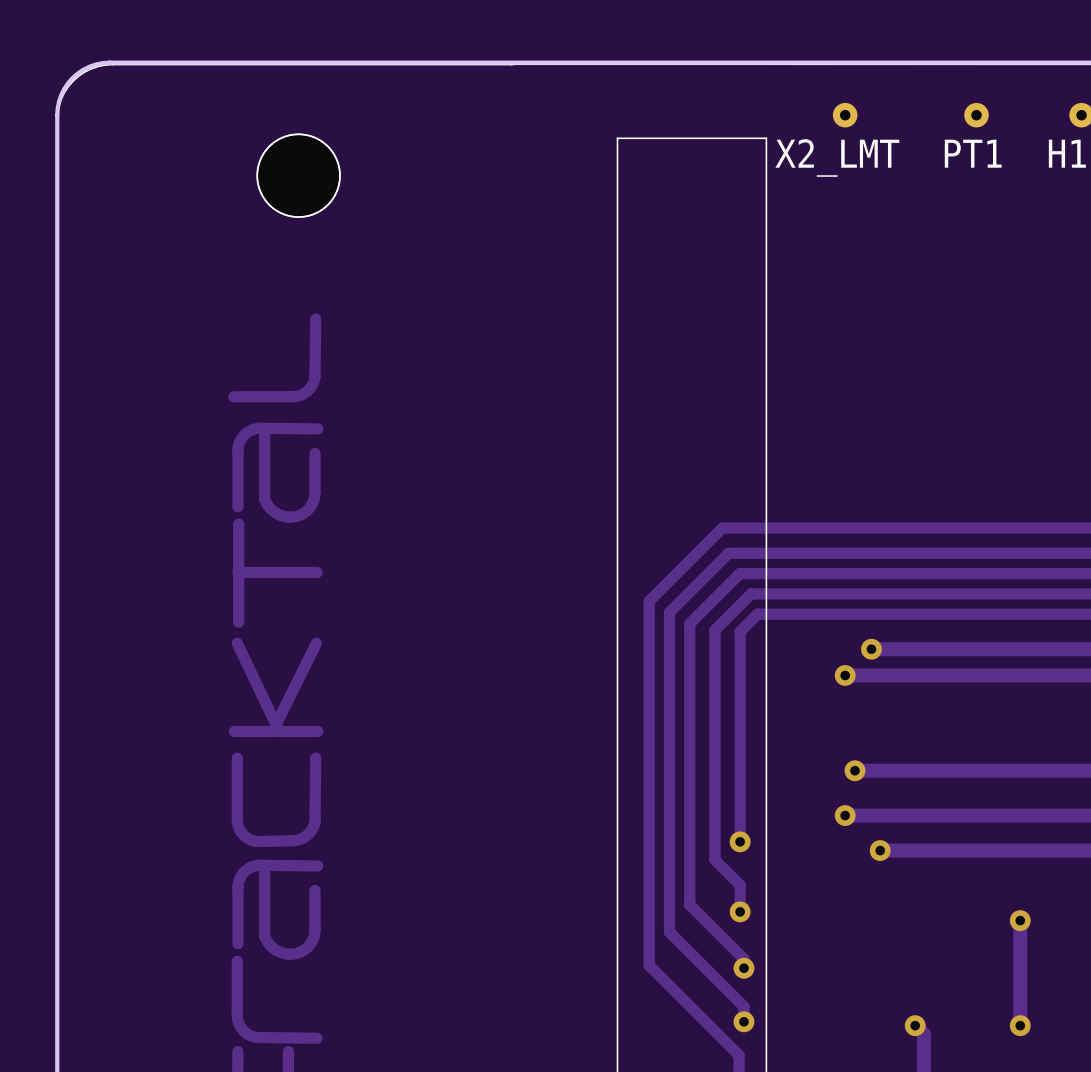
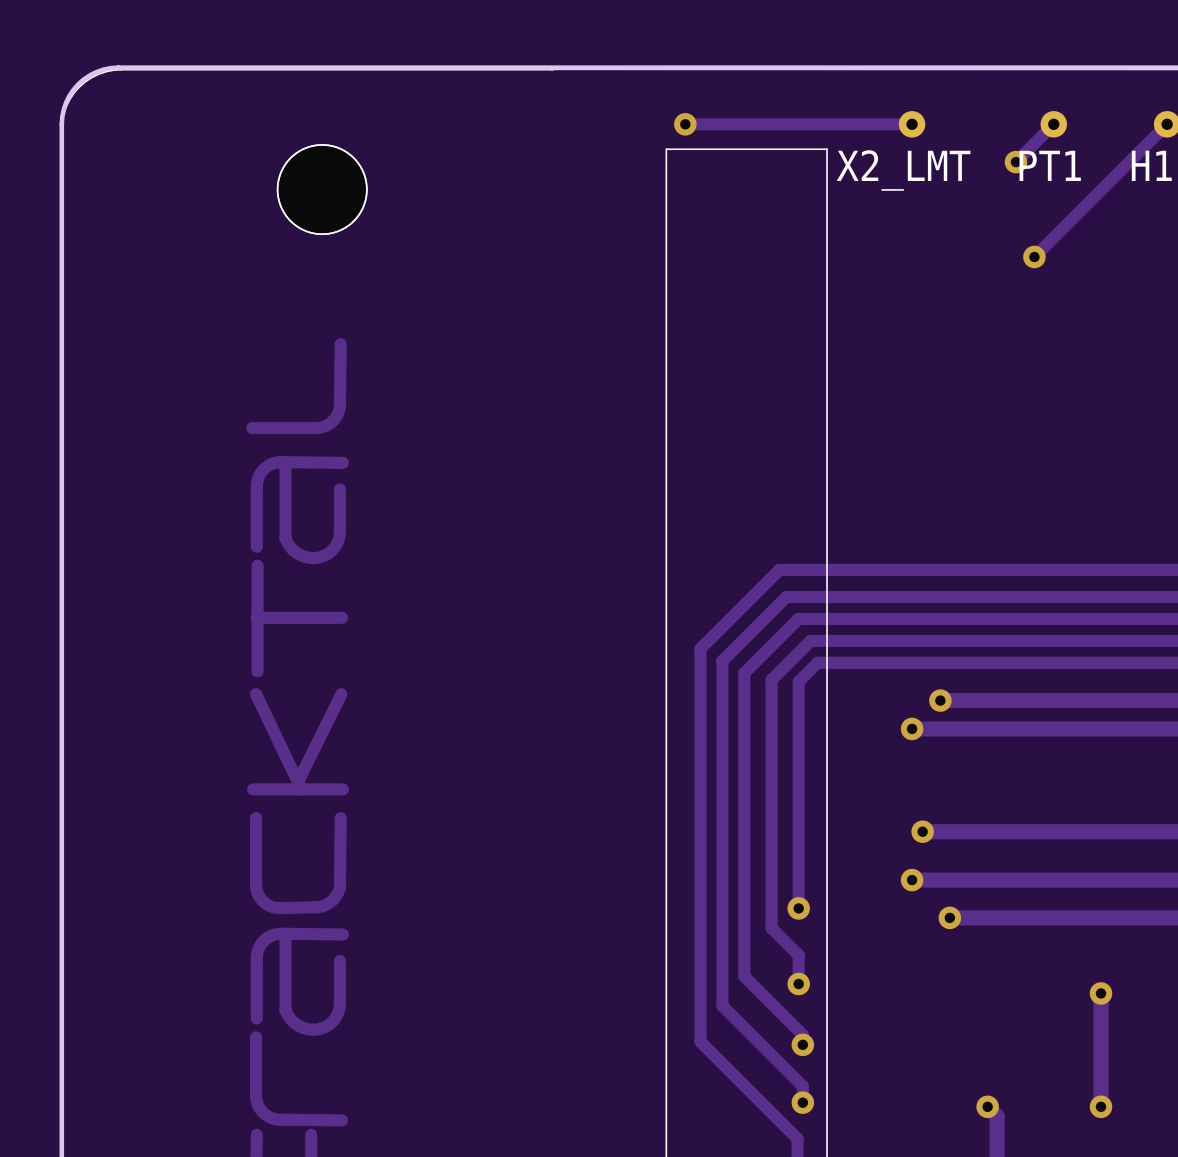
via: none -> (685, 124)
track: none -> (912, 124) (685, 124)
track: none -> (1053, 124) (1015, 162)
track: none -> (1167, 124) (1034, 257)
via: none -> (1015, 162)
via: none -> (1034, 257)

